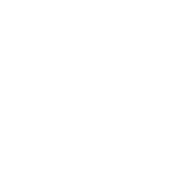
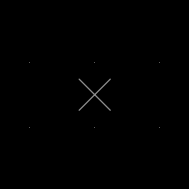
no-connect mark: none -> (94, 94)

